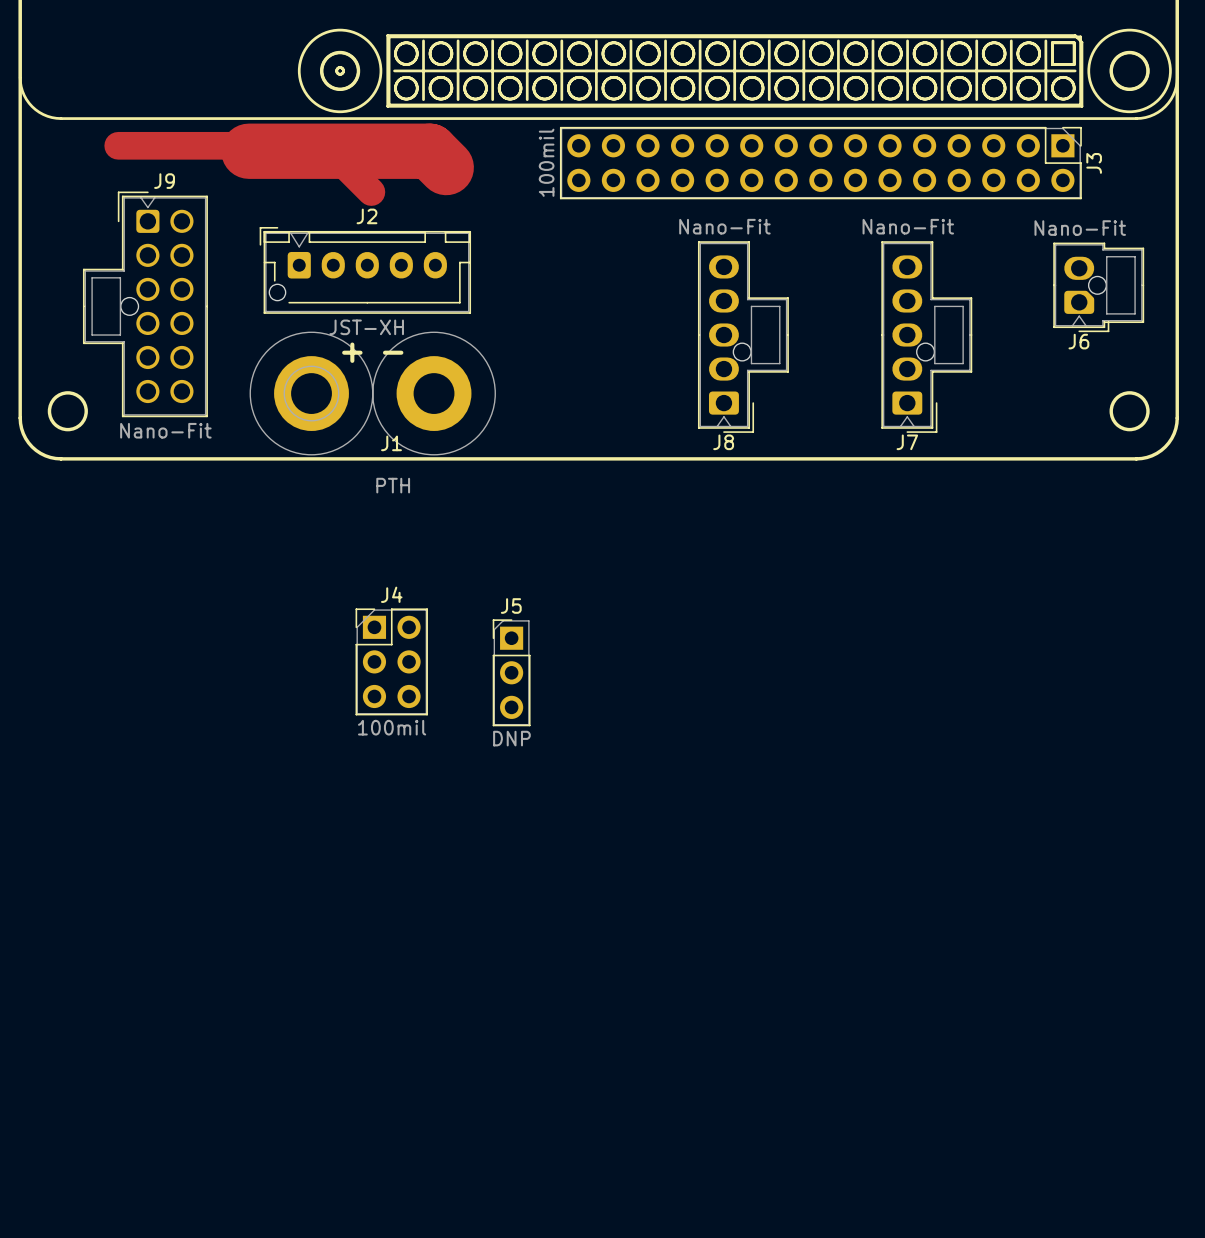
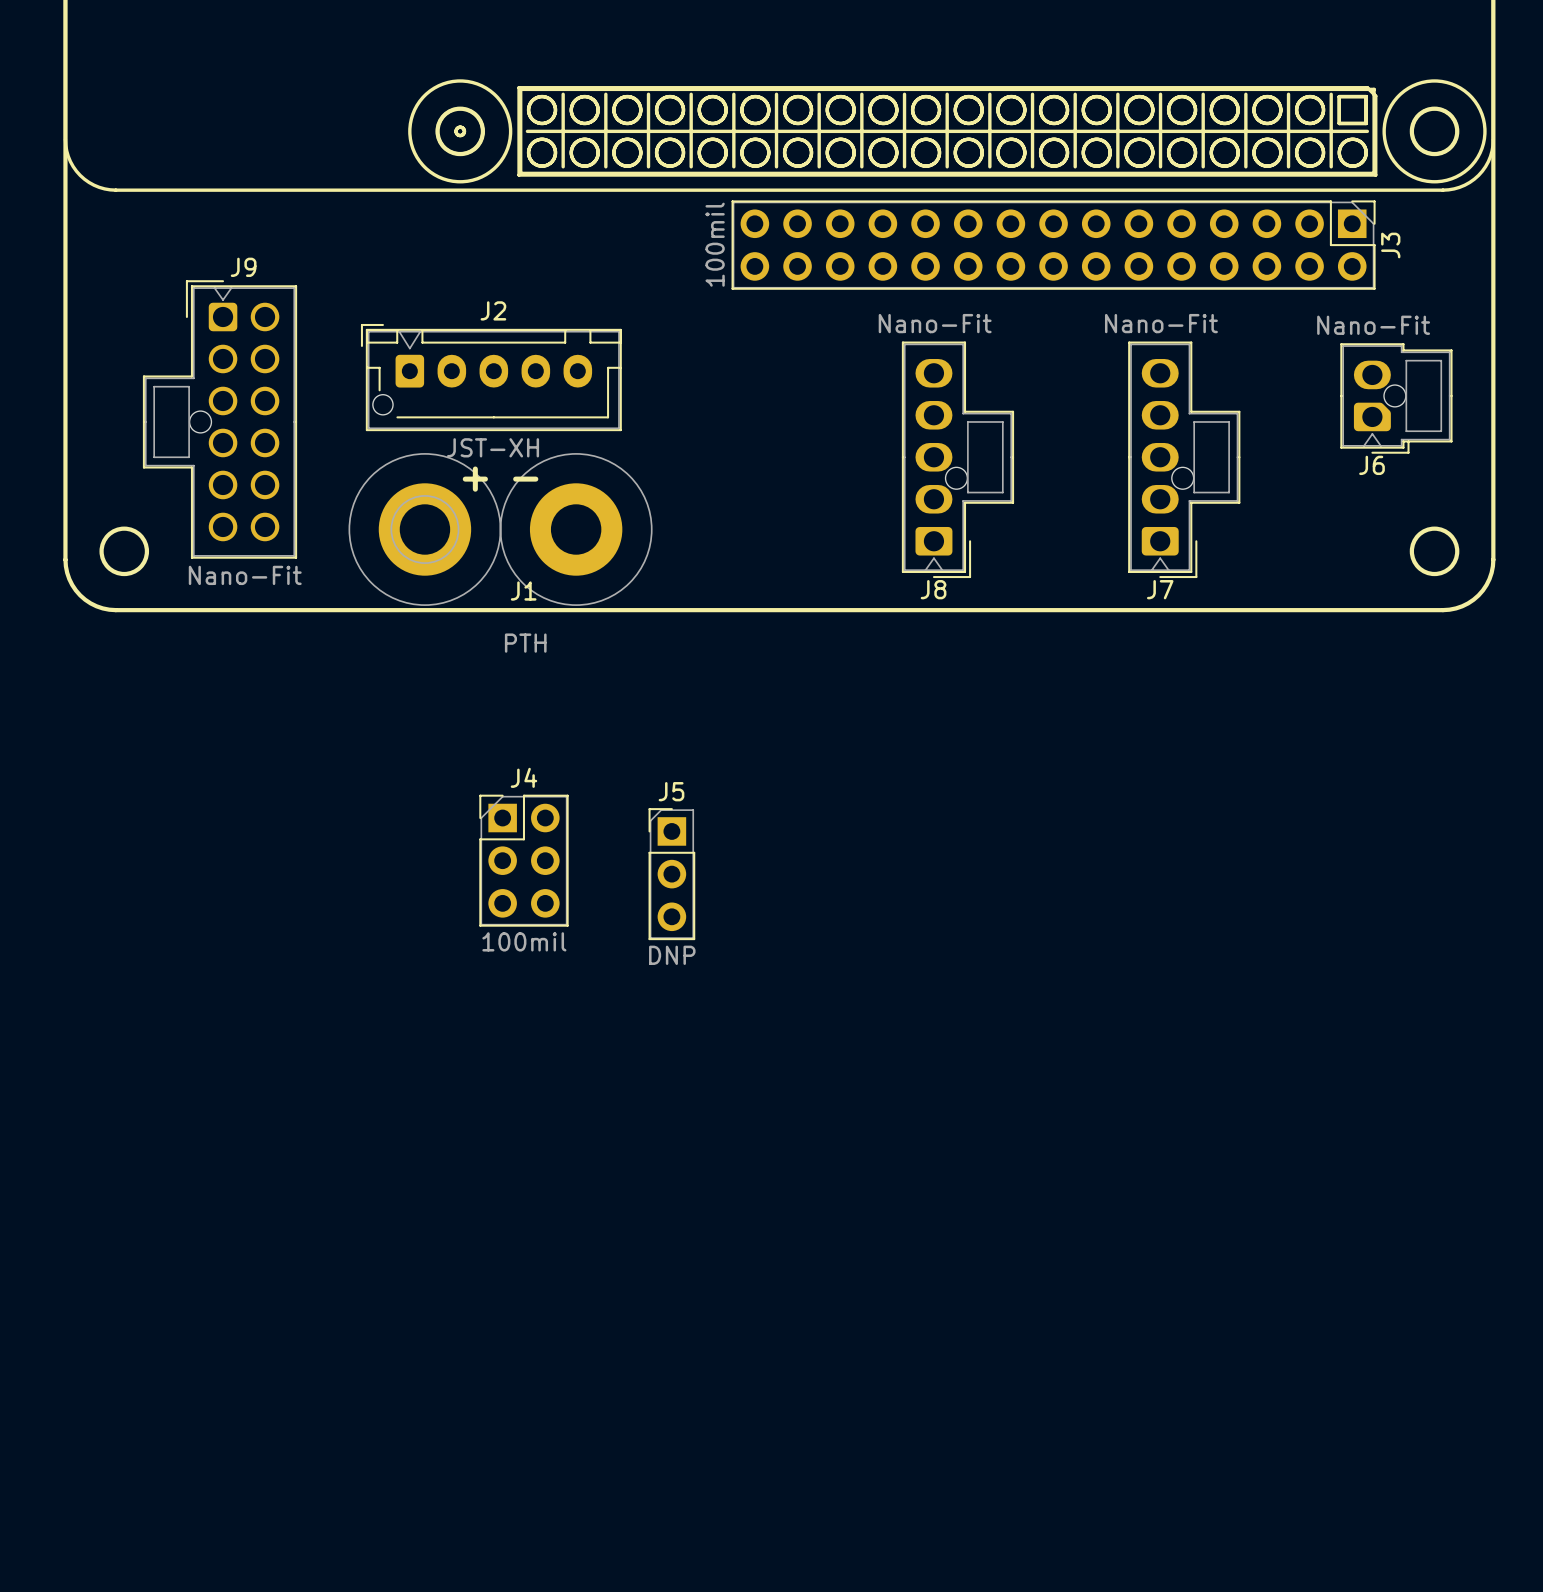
track: (118, 145) (325, 145) (371, 192) -> none
track: (248, 151) (429, 151) (446, 167) -> none

